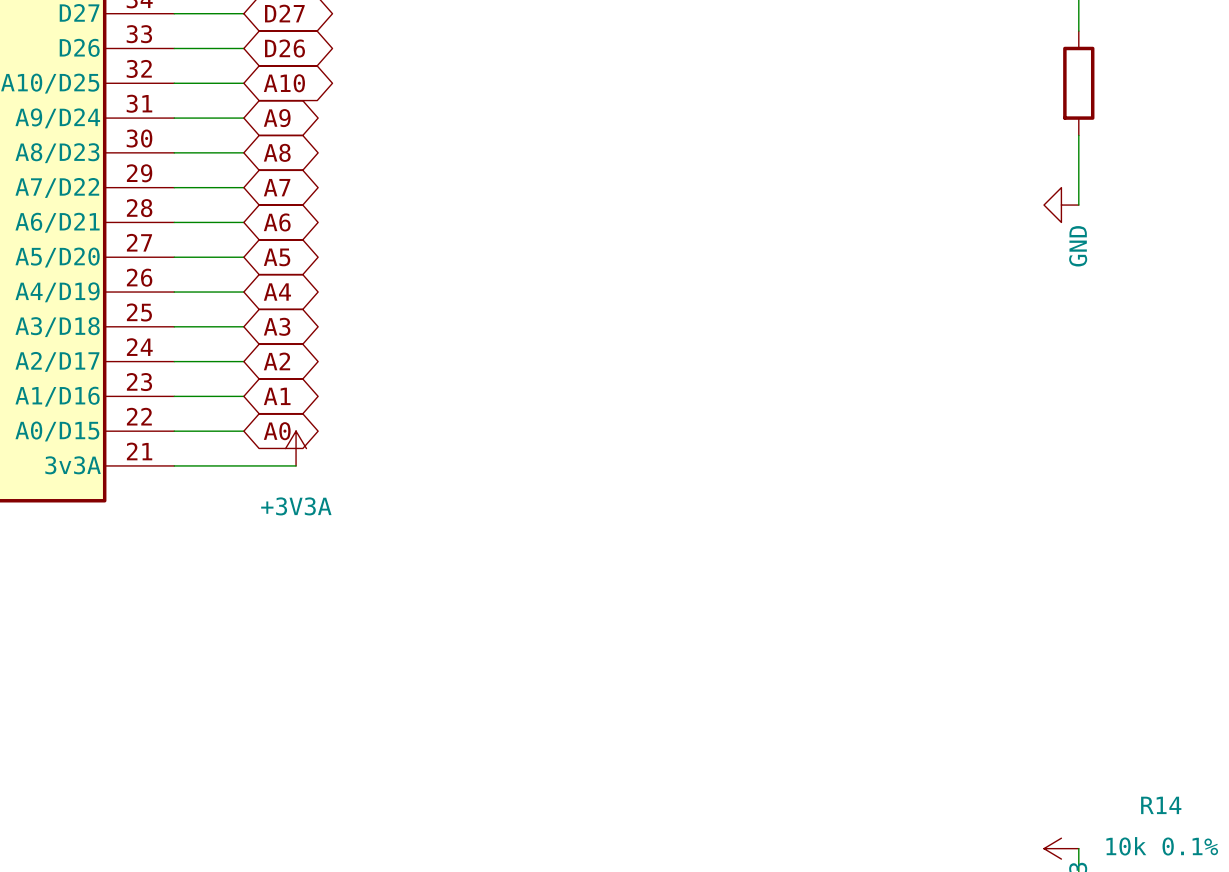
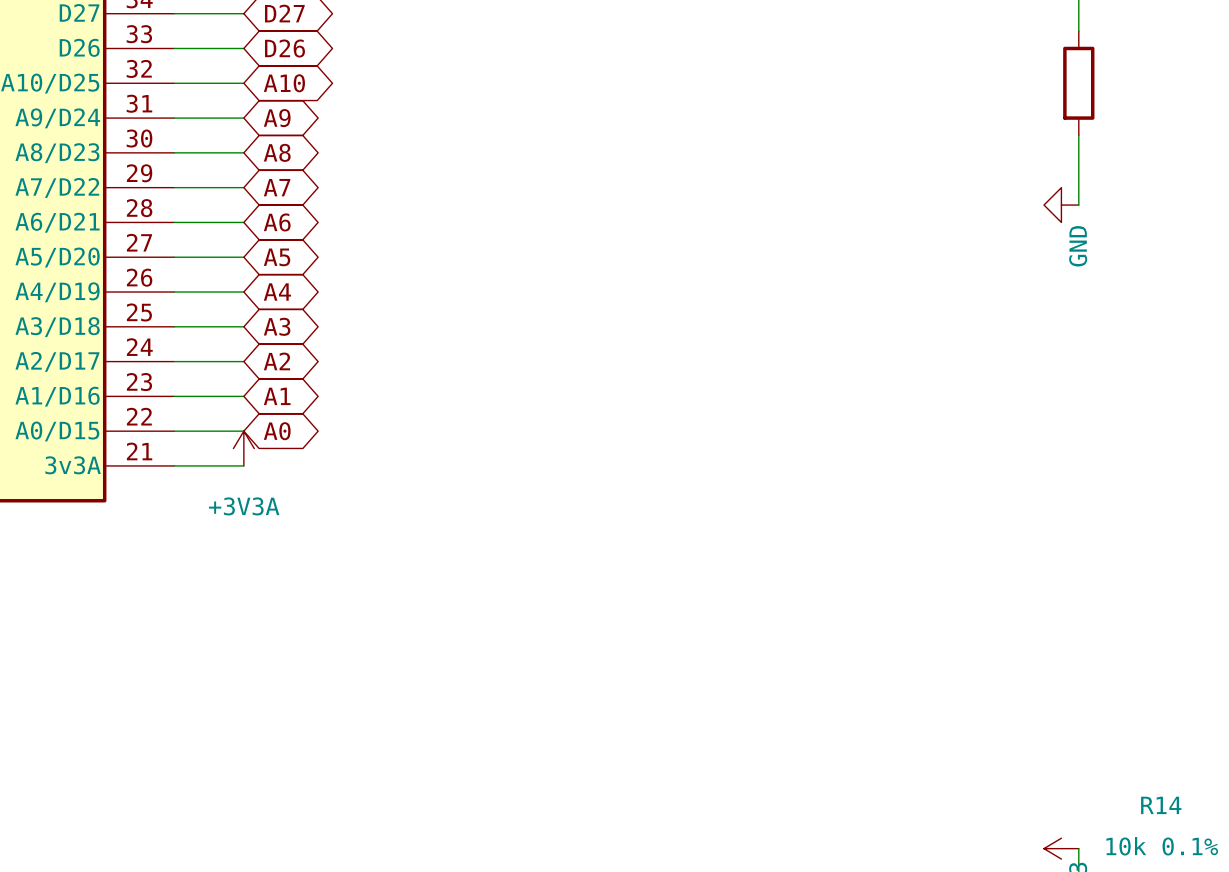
power symbol position: +3V3A (296, 448) -> +3V3A (243, 448)
wire: (243, 465) (296, 465) -> none

